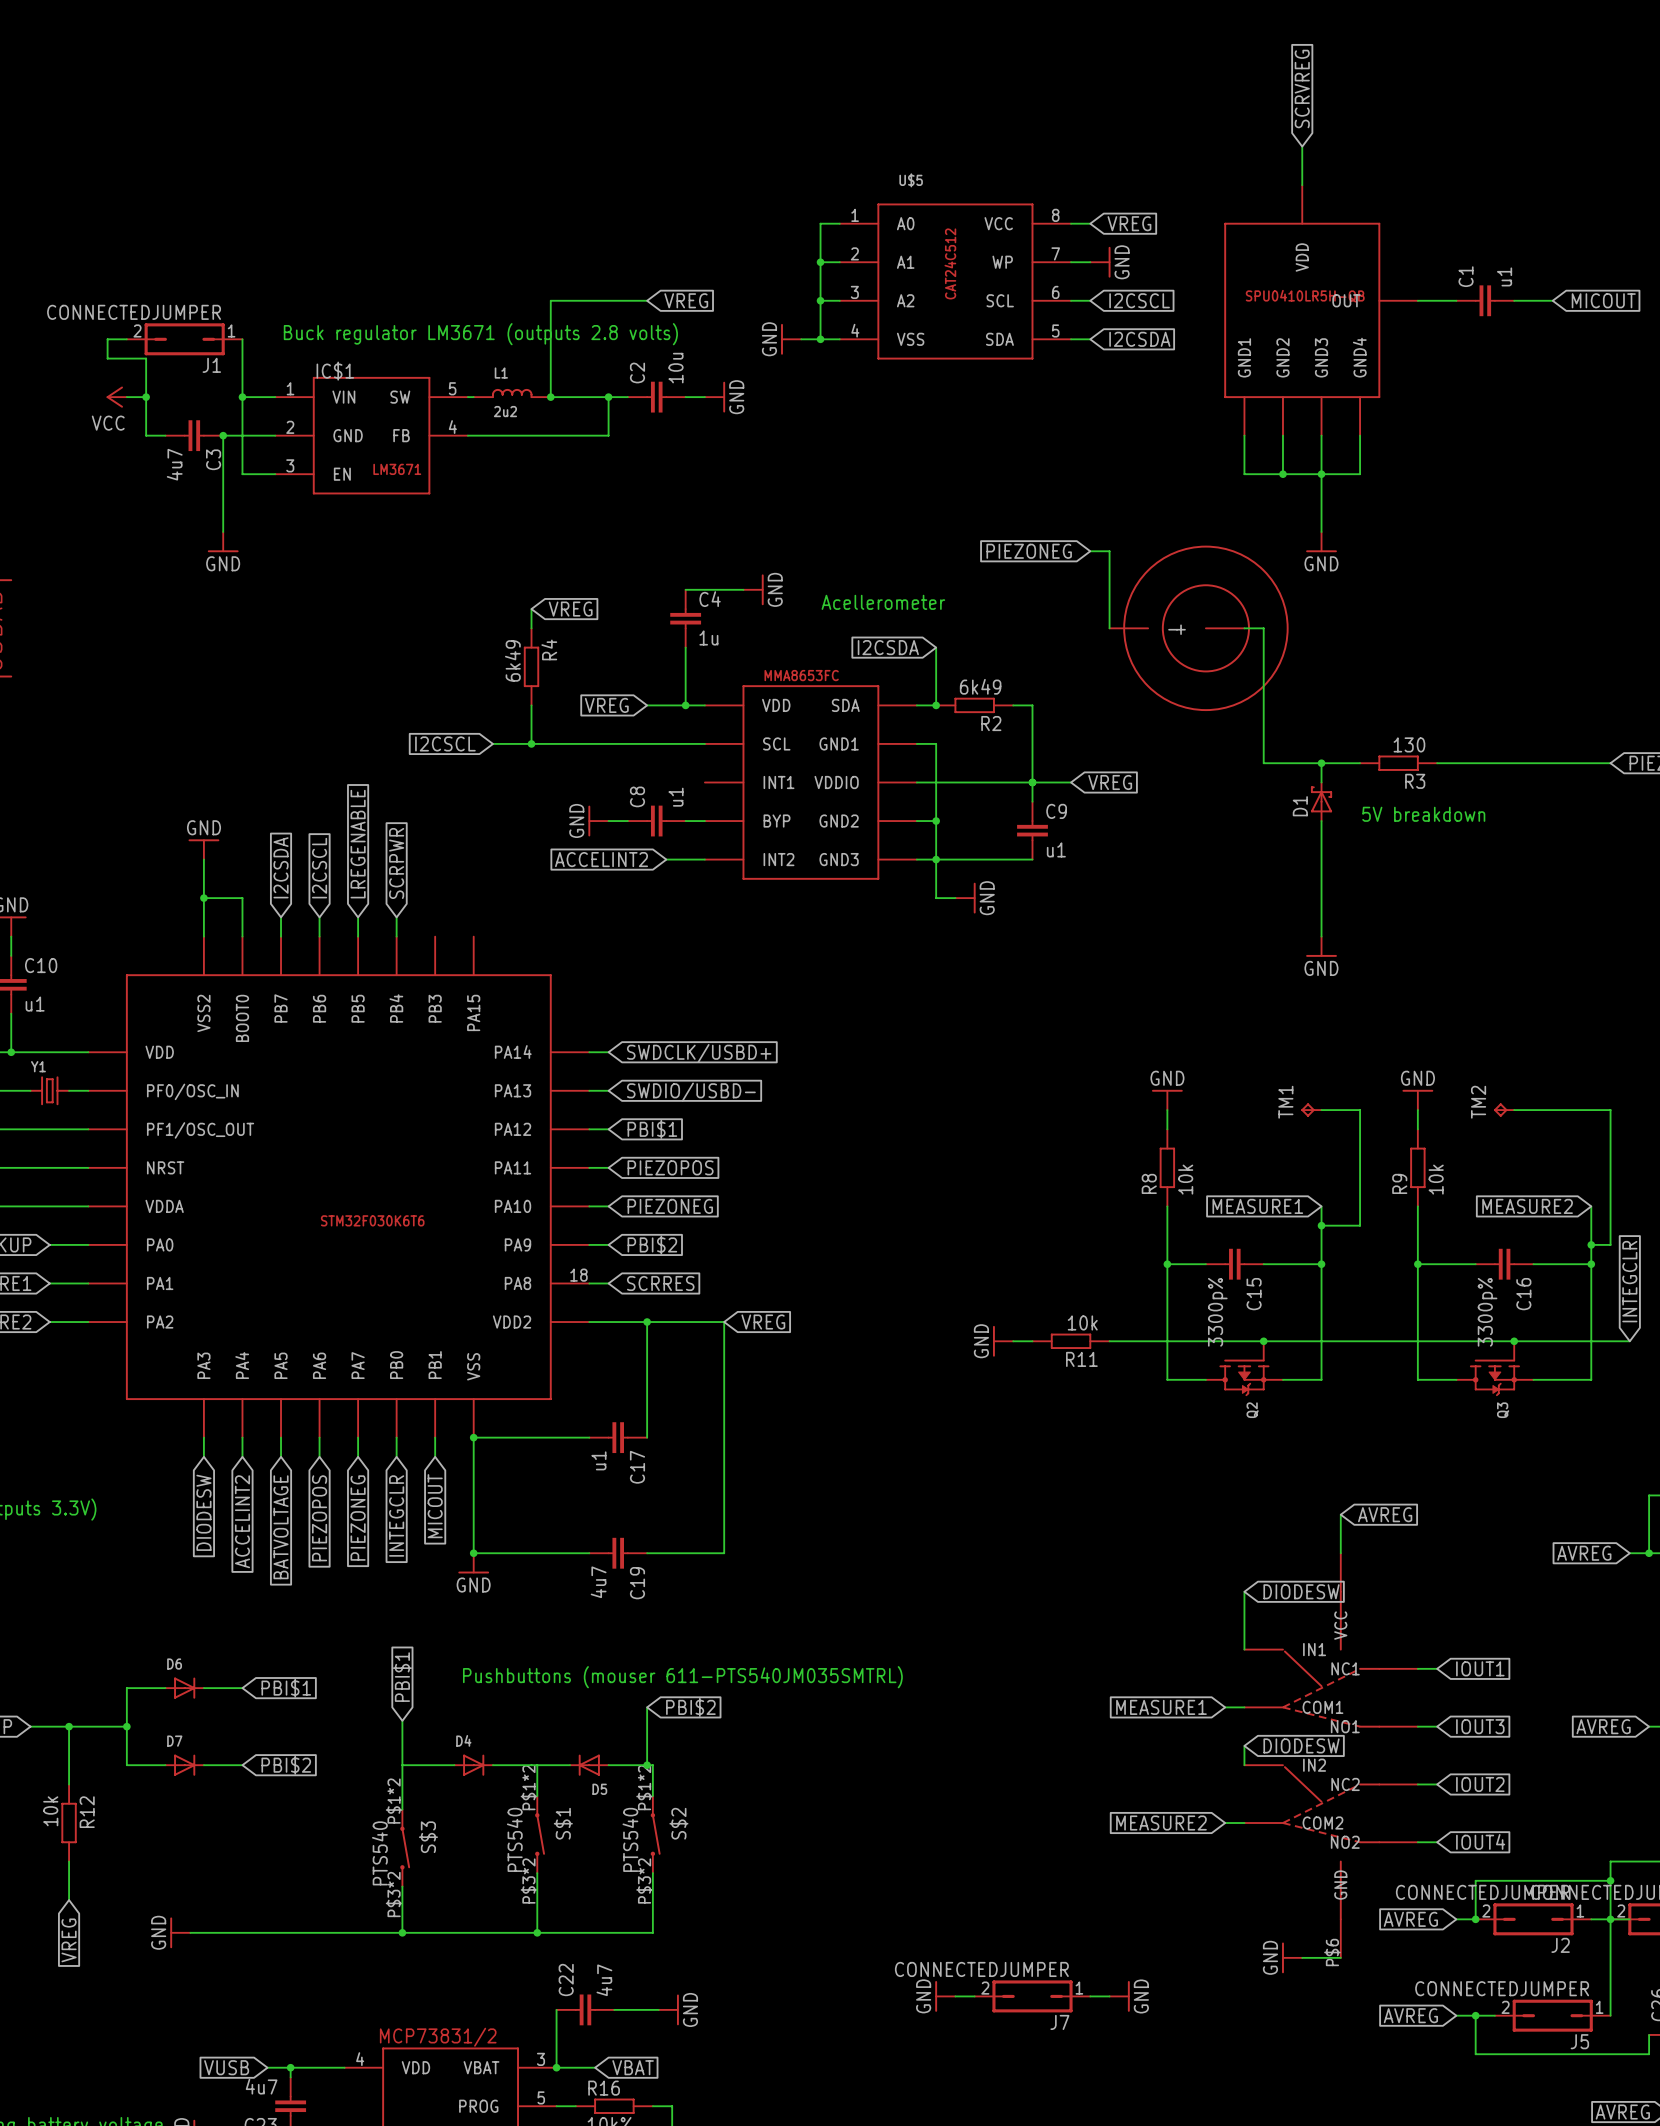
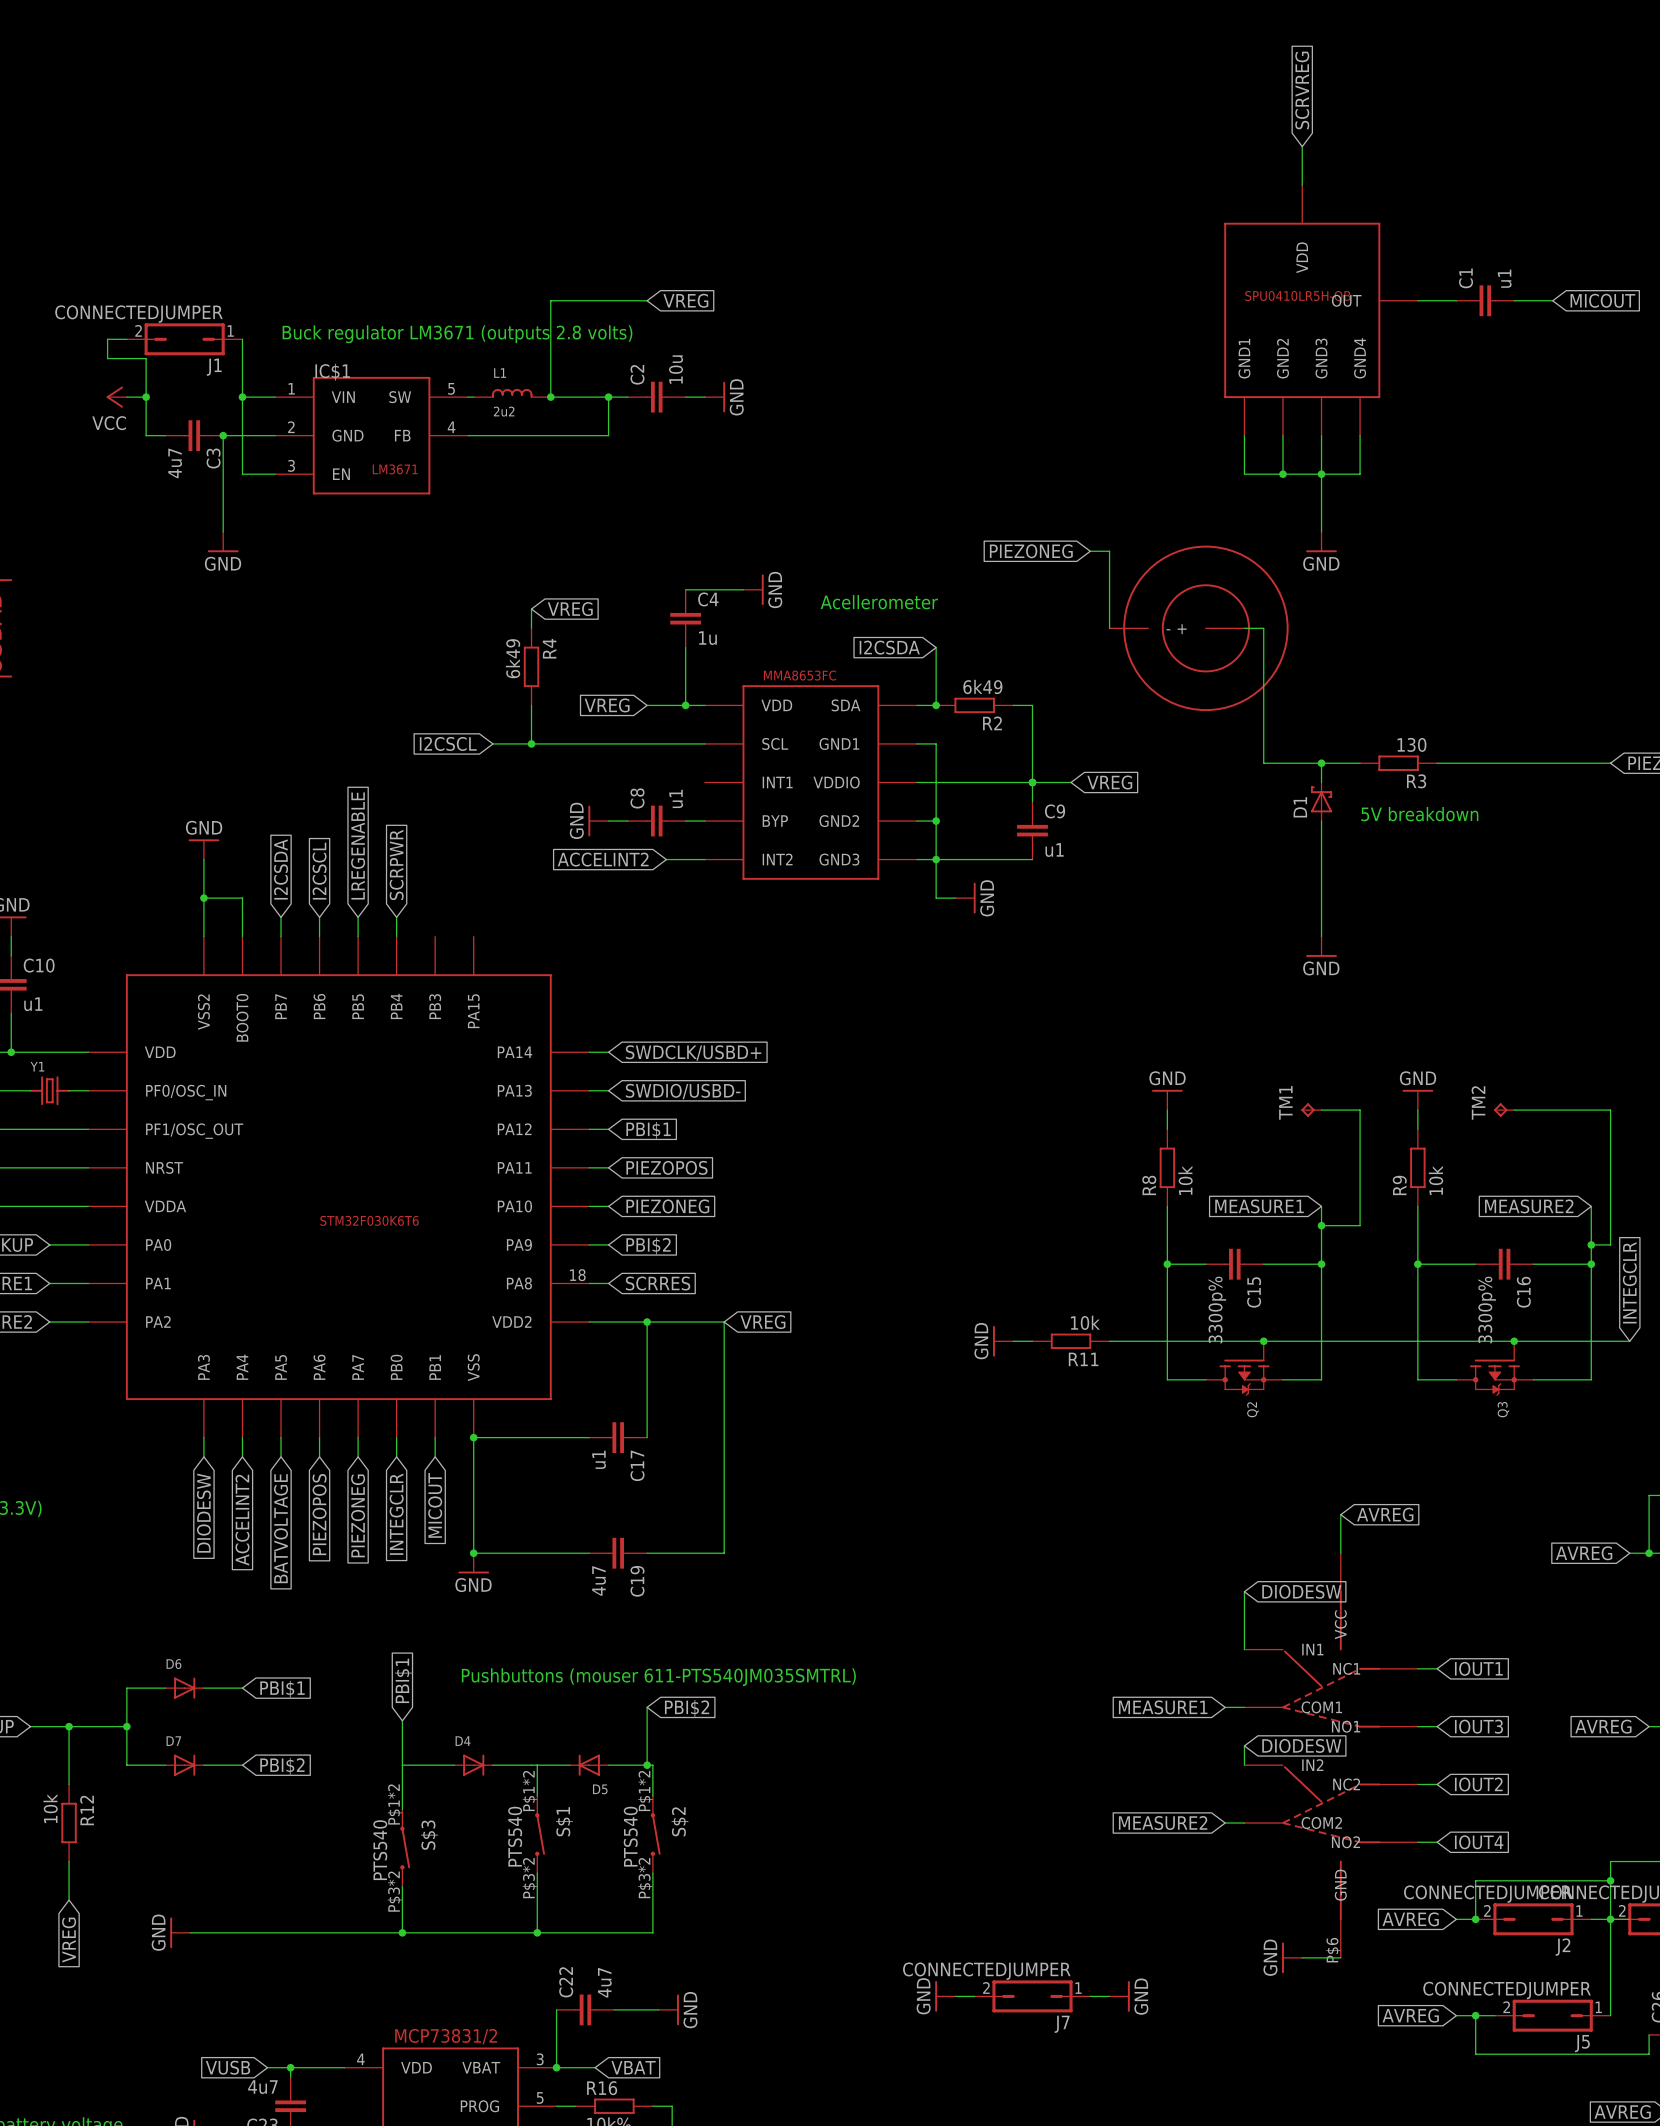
wire: (839, 223) (820, 223) (820, 339) -> none
wire: (1071, 223) (1090, 223) -> none
global label: VREG (1129, 223) -> none
wire: (820, 262) (839, 262) -> none
junction: (820, 262) -> none
wire: (1071, 262) (1090, 262) -> none
power symbol: GND (1100, 262) -> none
U$5: (955, 281) -> none
wire: (820, 300) (839, 300) -> none
junction: (820, 300) -> none
wire: (1071, 300) (1090, 300) -> none
global label: I2CSCL (1139, 300) -> none
power symbol: GND (791, 339) -> none
wire: (801, 339) (839, 339) -> none
junction: (820, 339) -> none
wire: (1071, 339) (1090, 339) -> none
global label: I2CSDA (1139, 339) -> none

